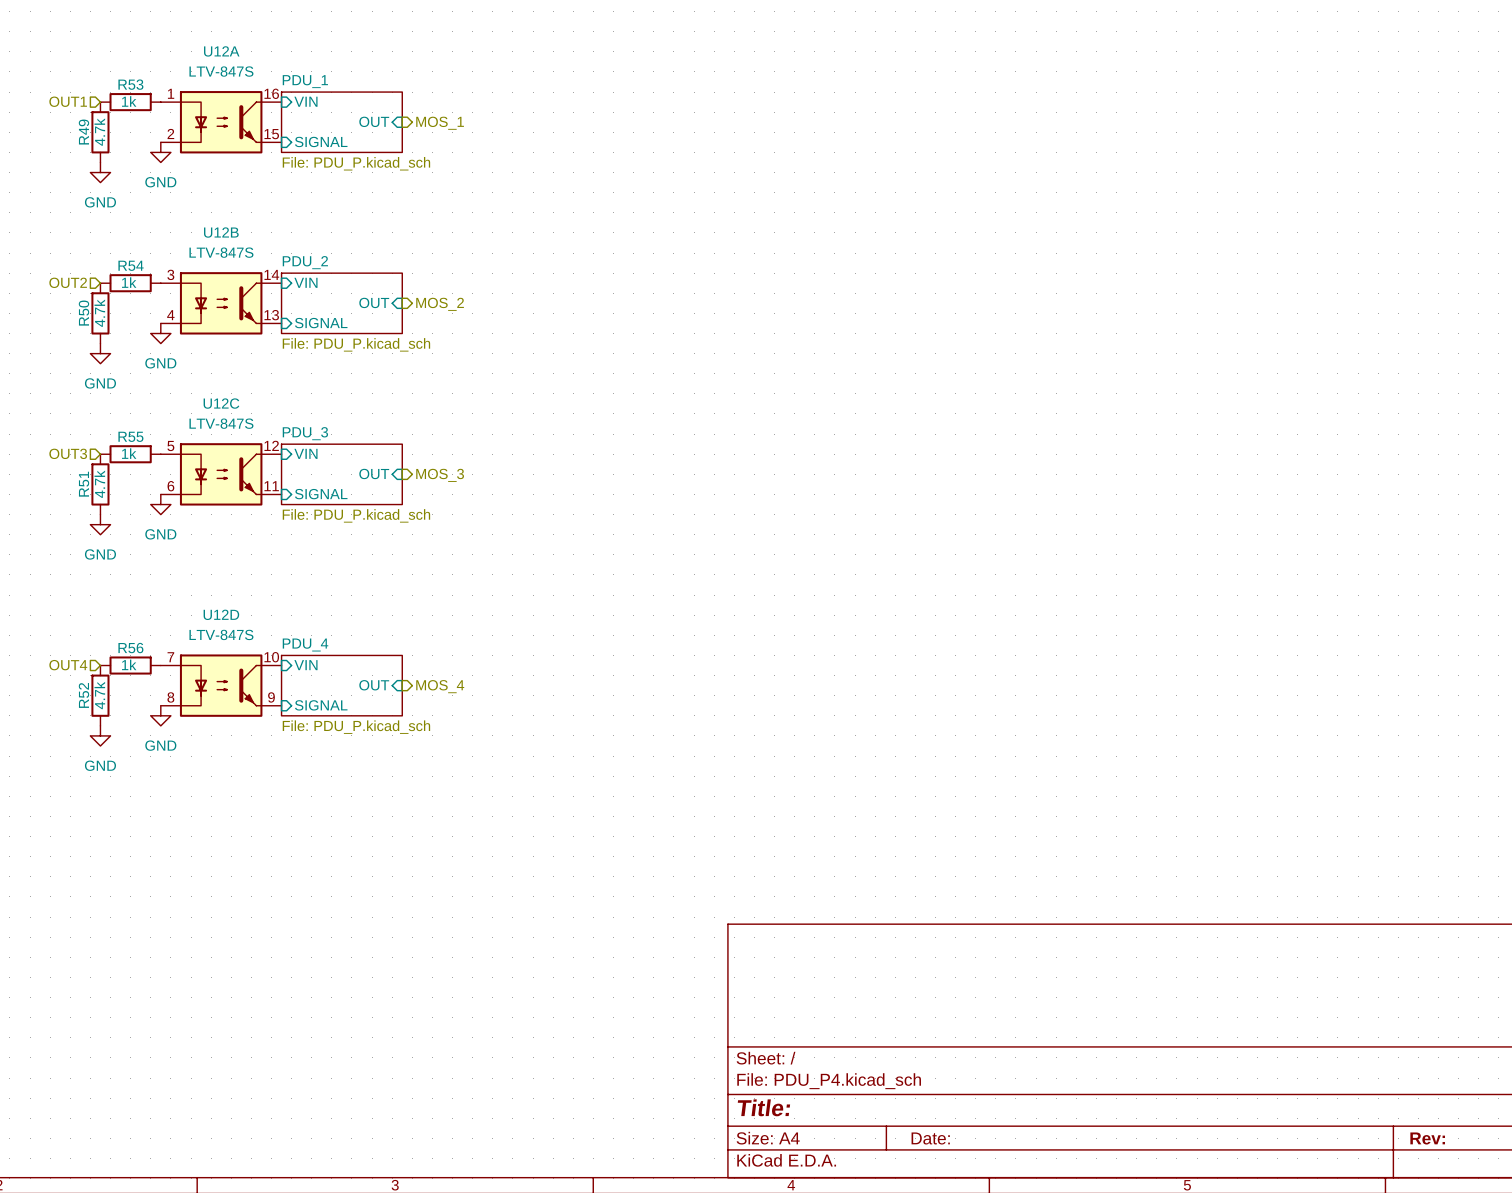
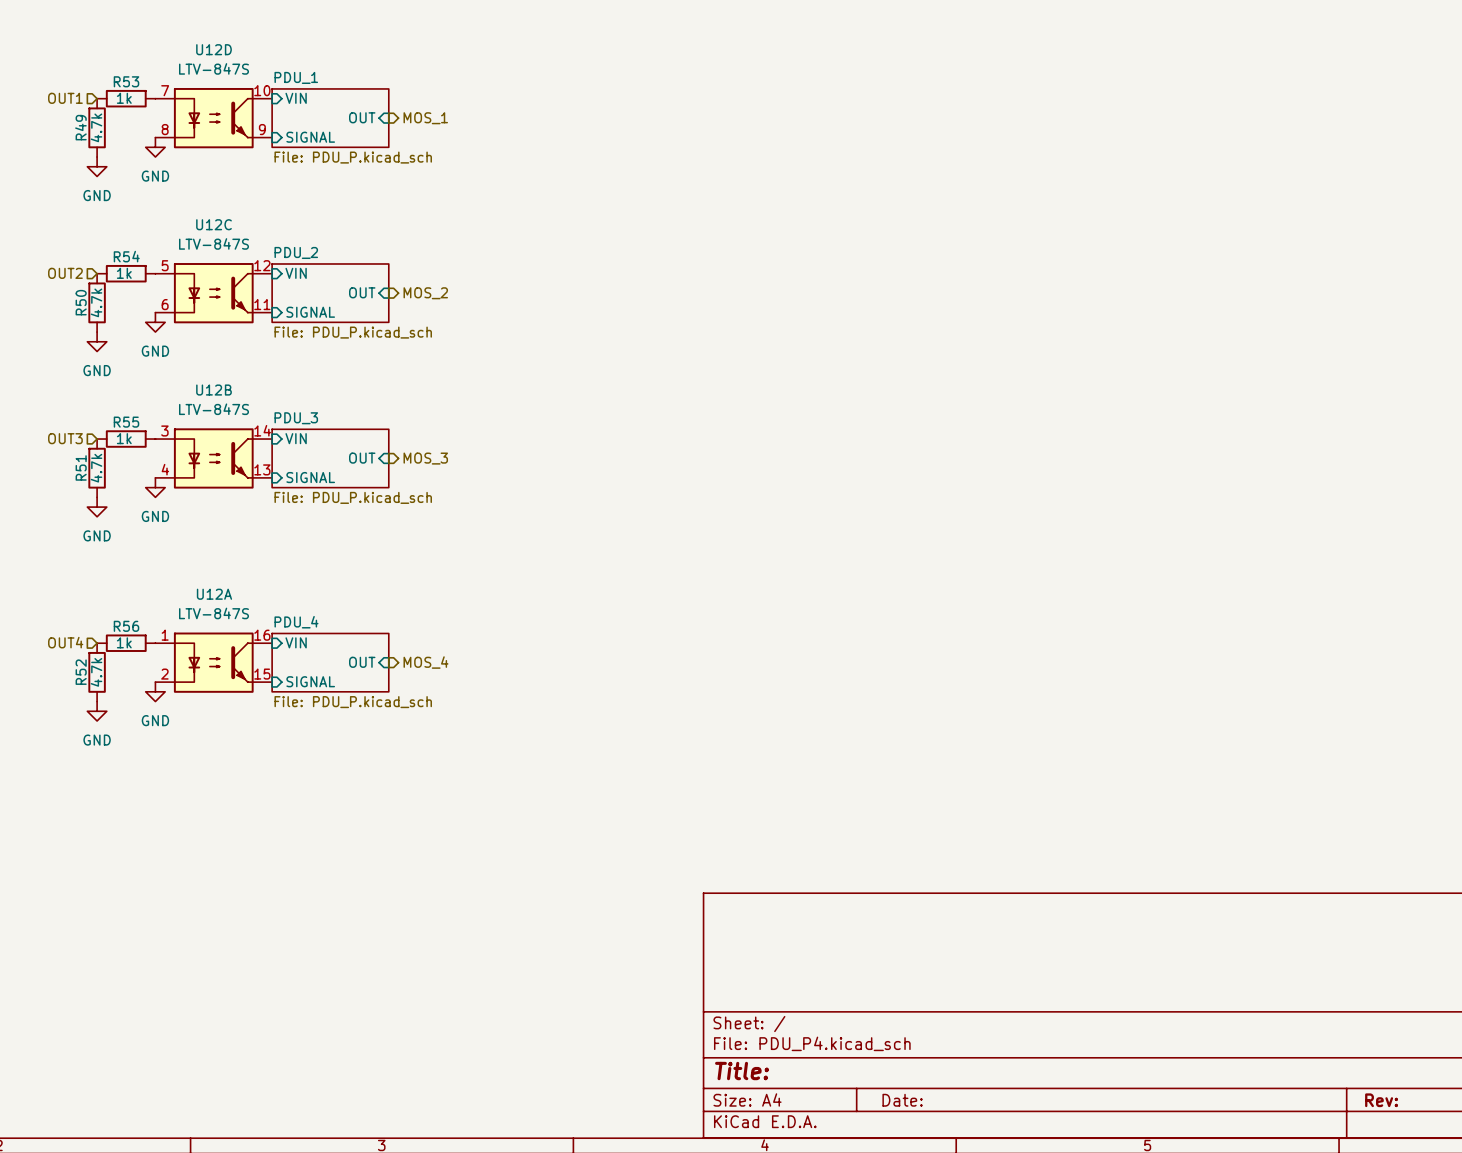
U12A position: (221, 122) -> (213, 662)
U12B position: (221, 303) -> (213, 458)
U12C position: (221, 474) -> (213, 293)
U12D position: (221, 685) -> (213, 118)

